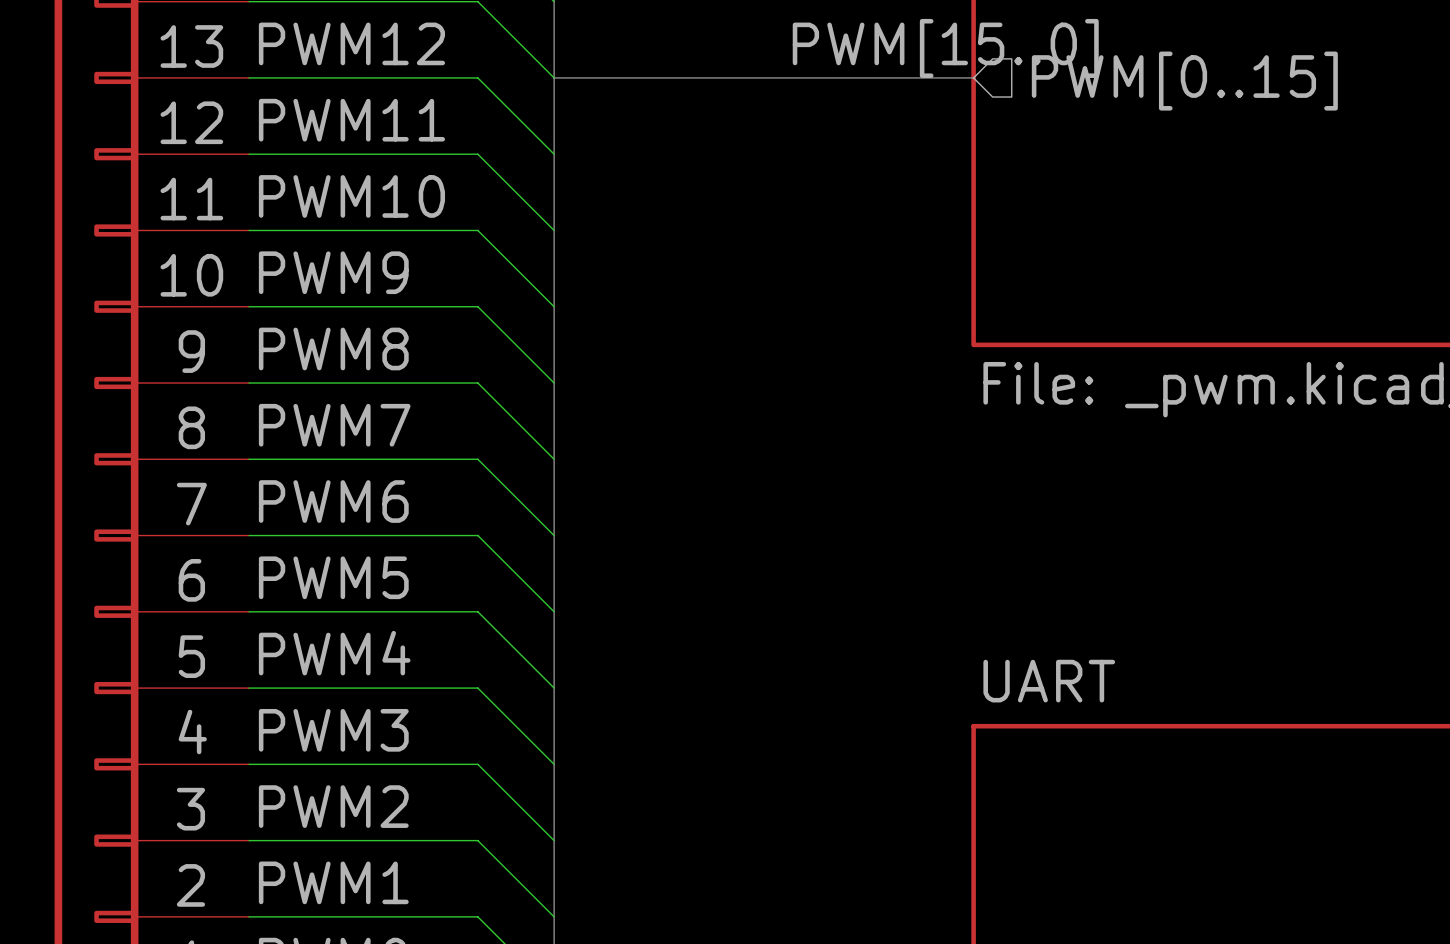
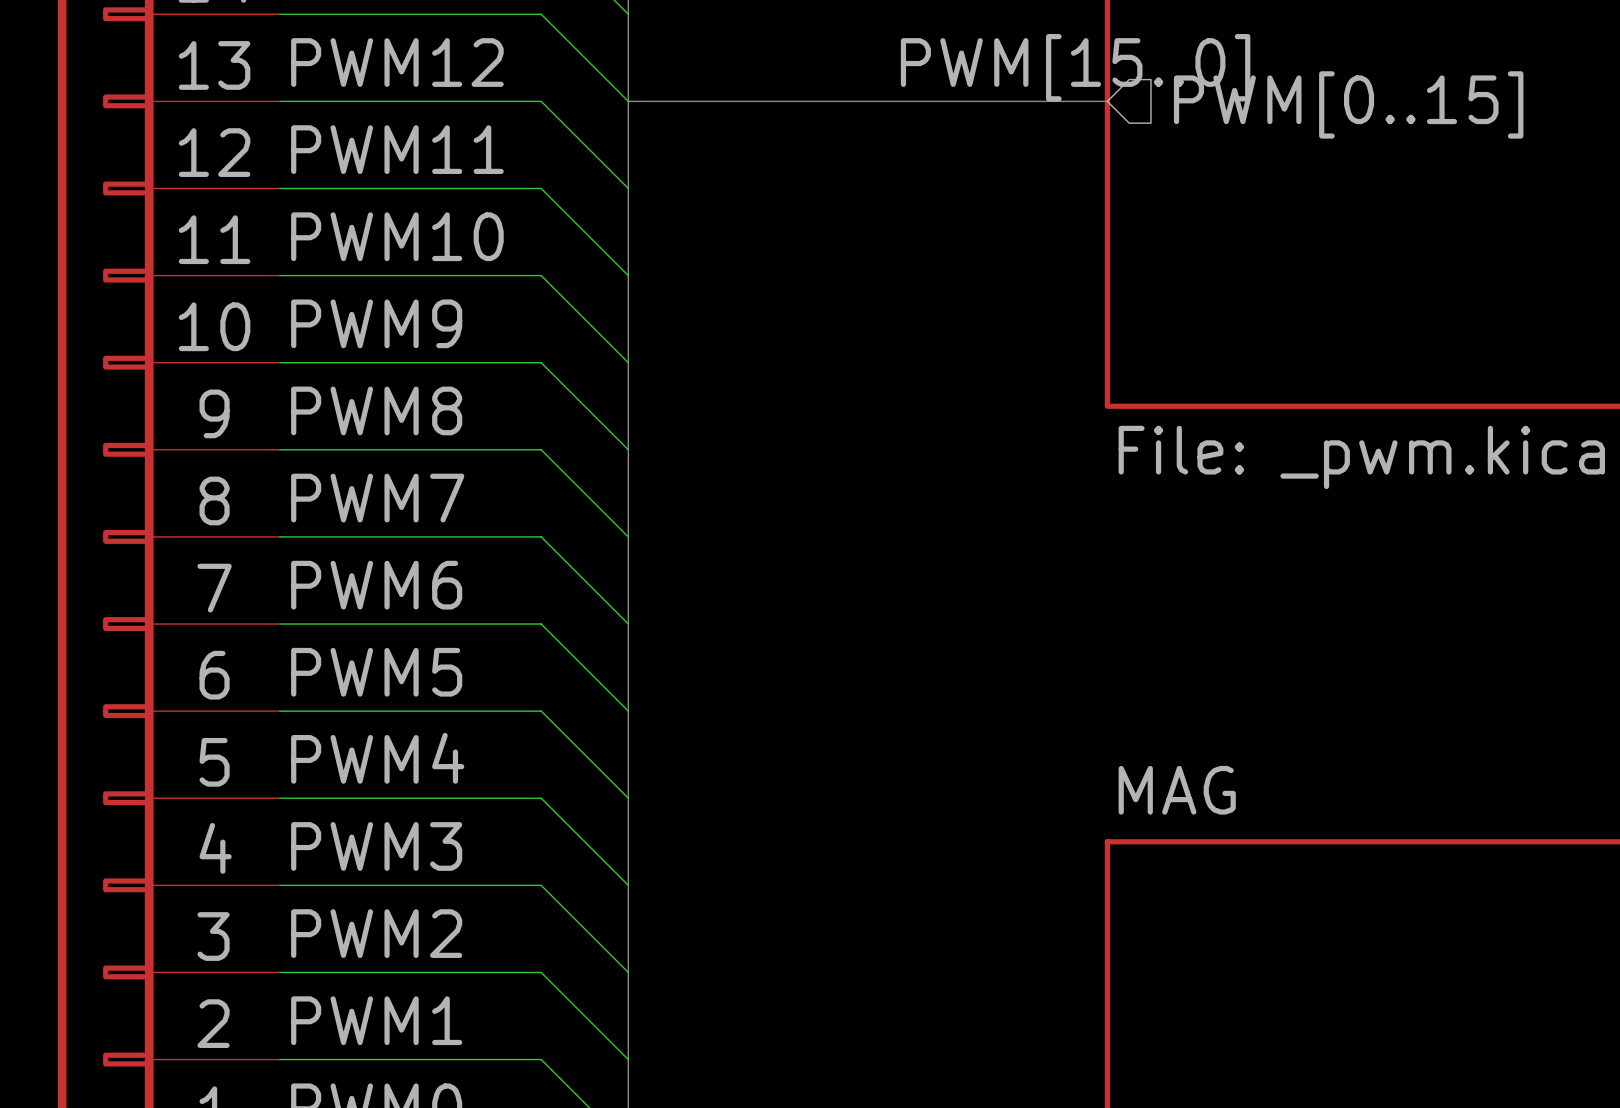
sheet UART name: UART (1049, 681) -> MAG (1177, 790)

